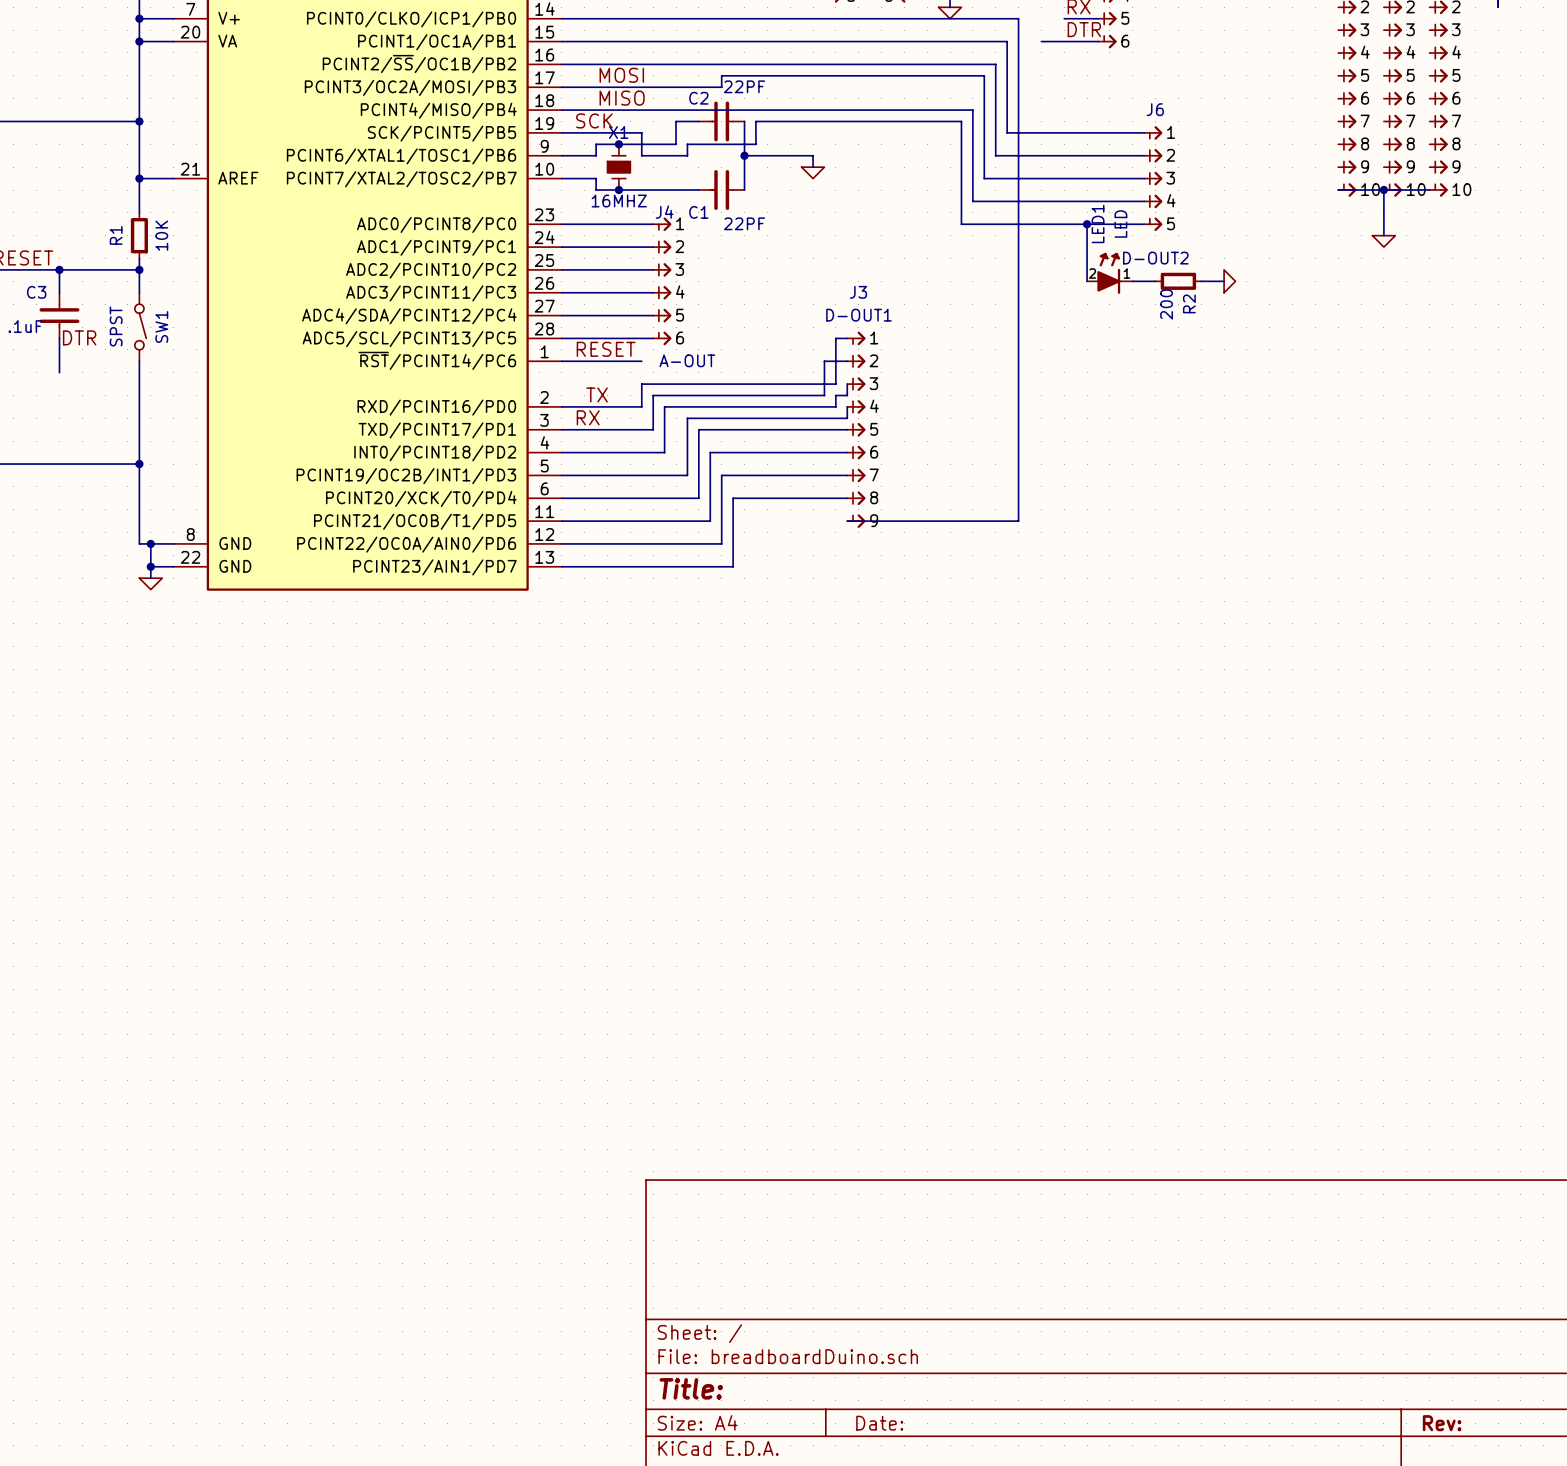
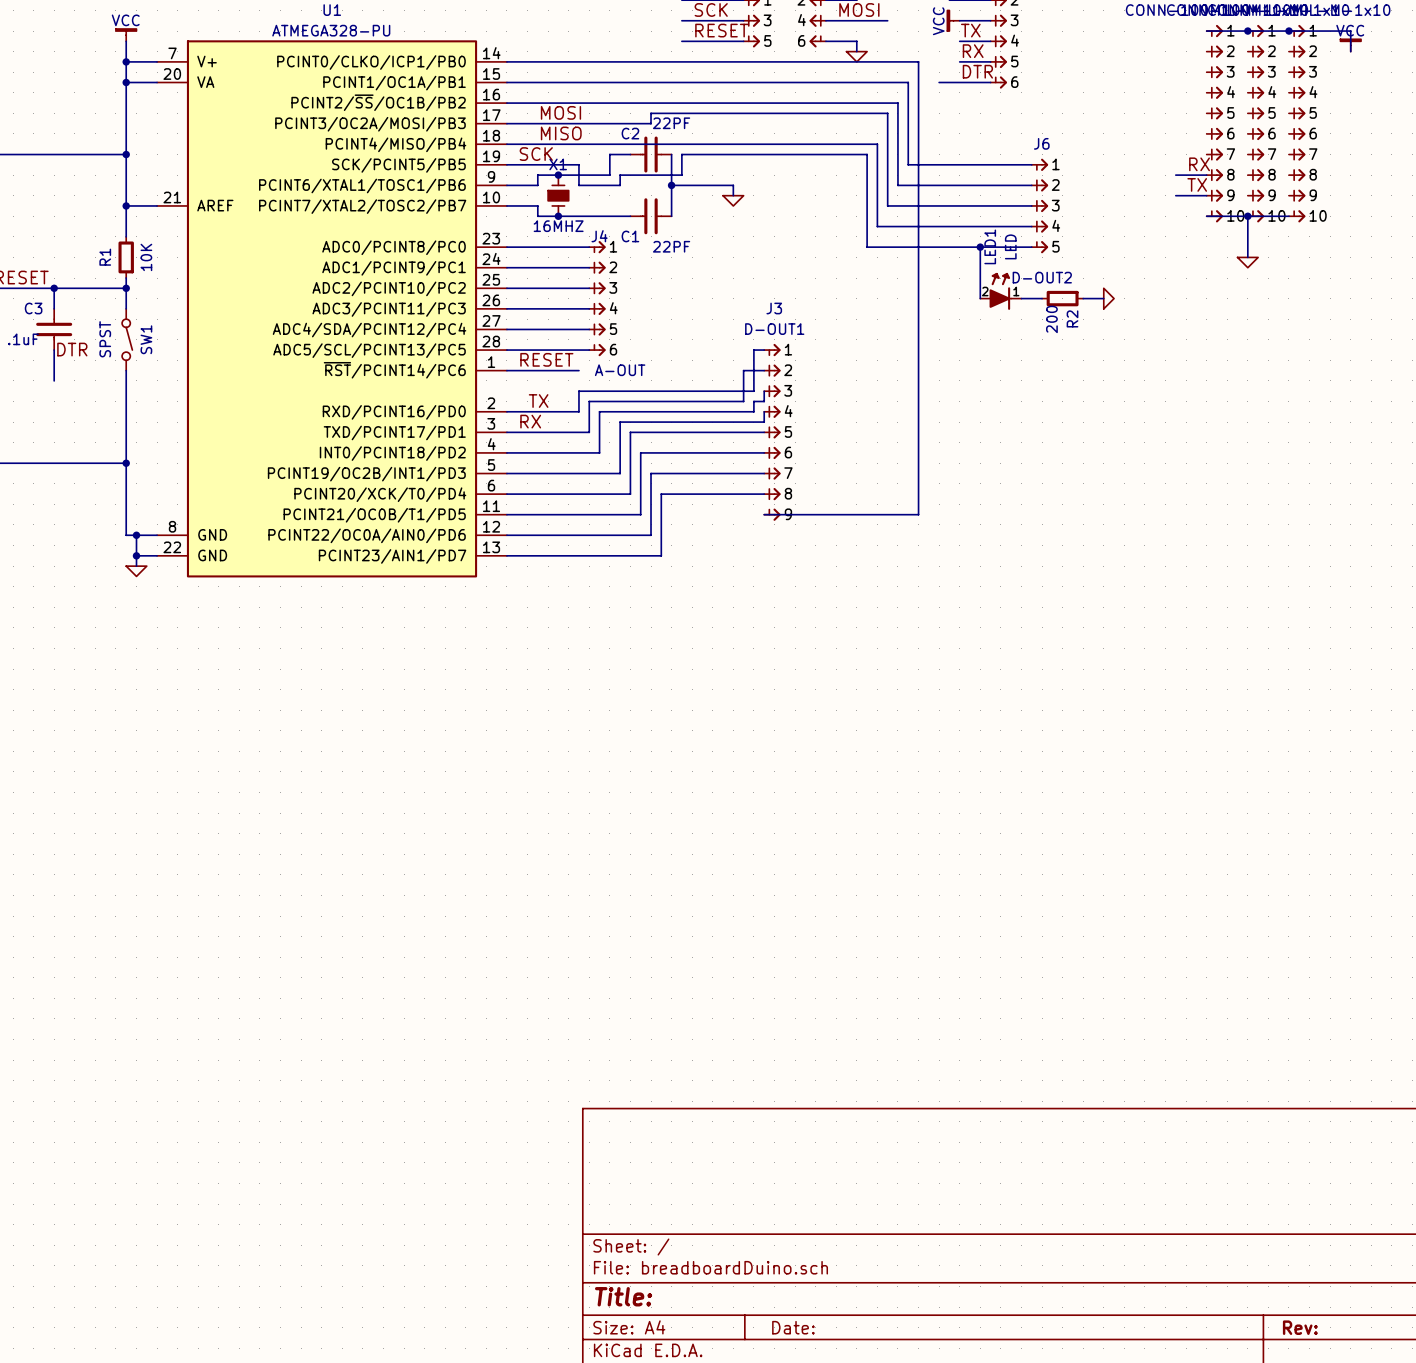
label: none -> RX (1199, 164)
wire: none -> (1175, 175) (1206, 175)
label: none -> TX (1197, 184)
wire: none -> (1175, 195) (1206, 195)

